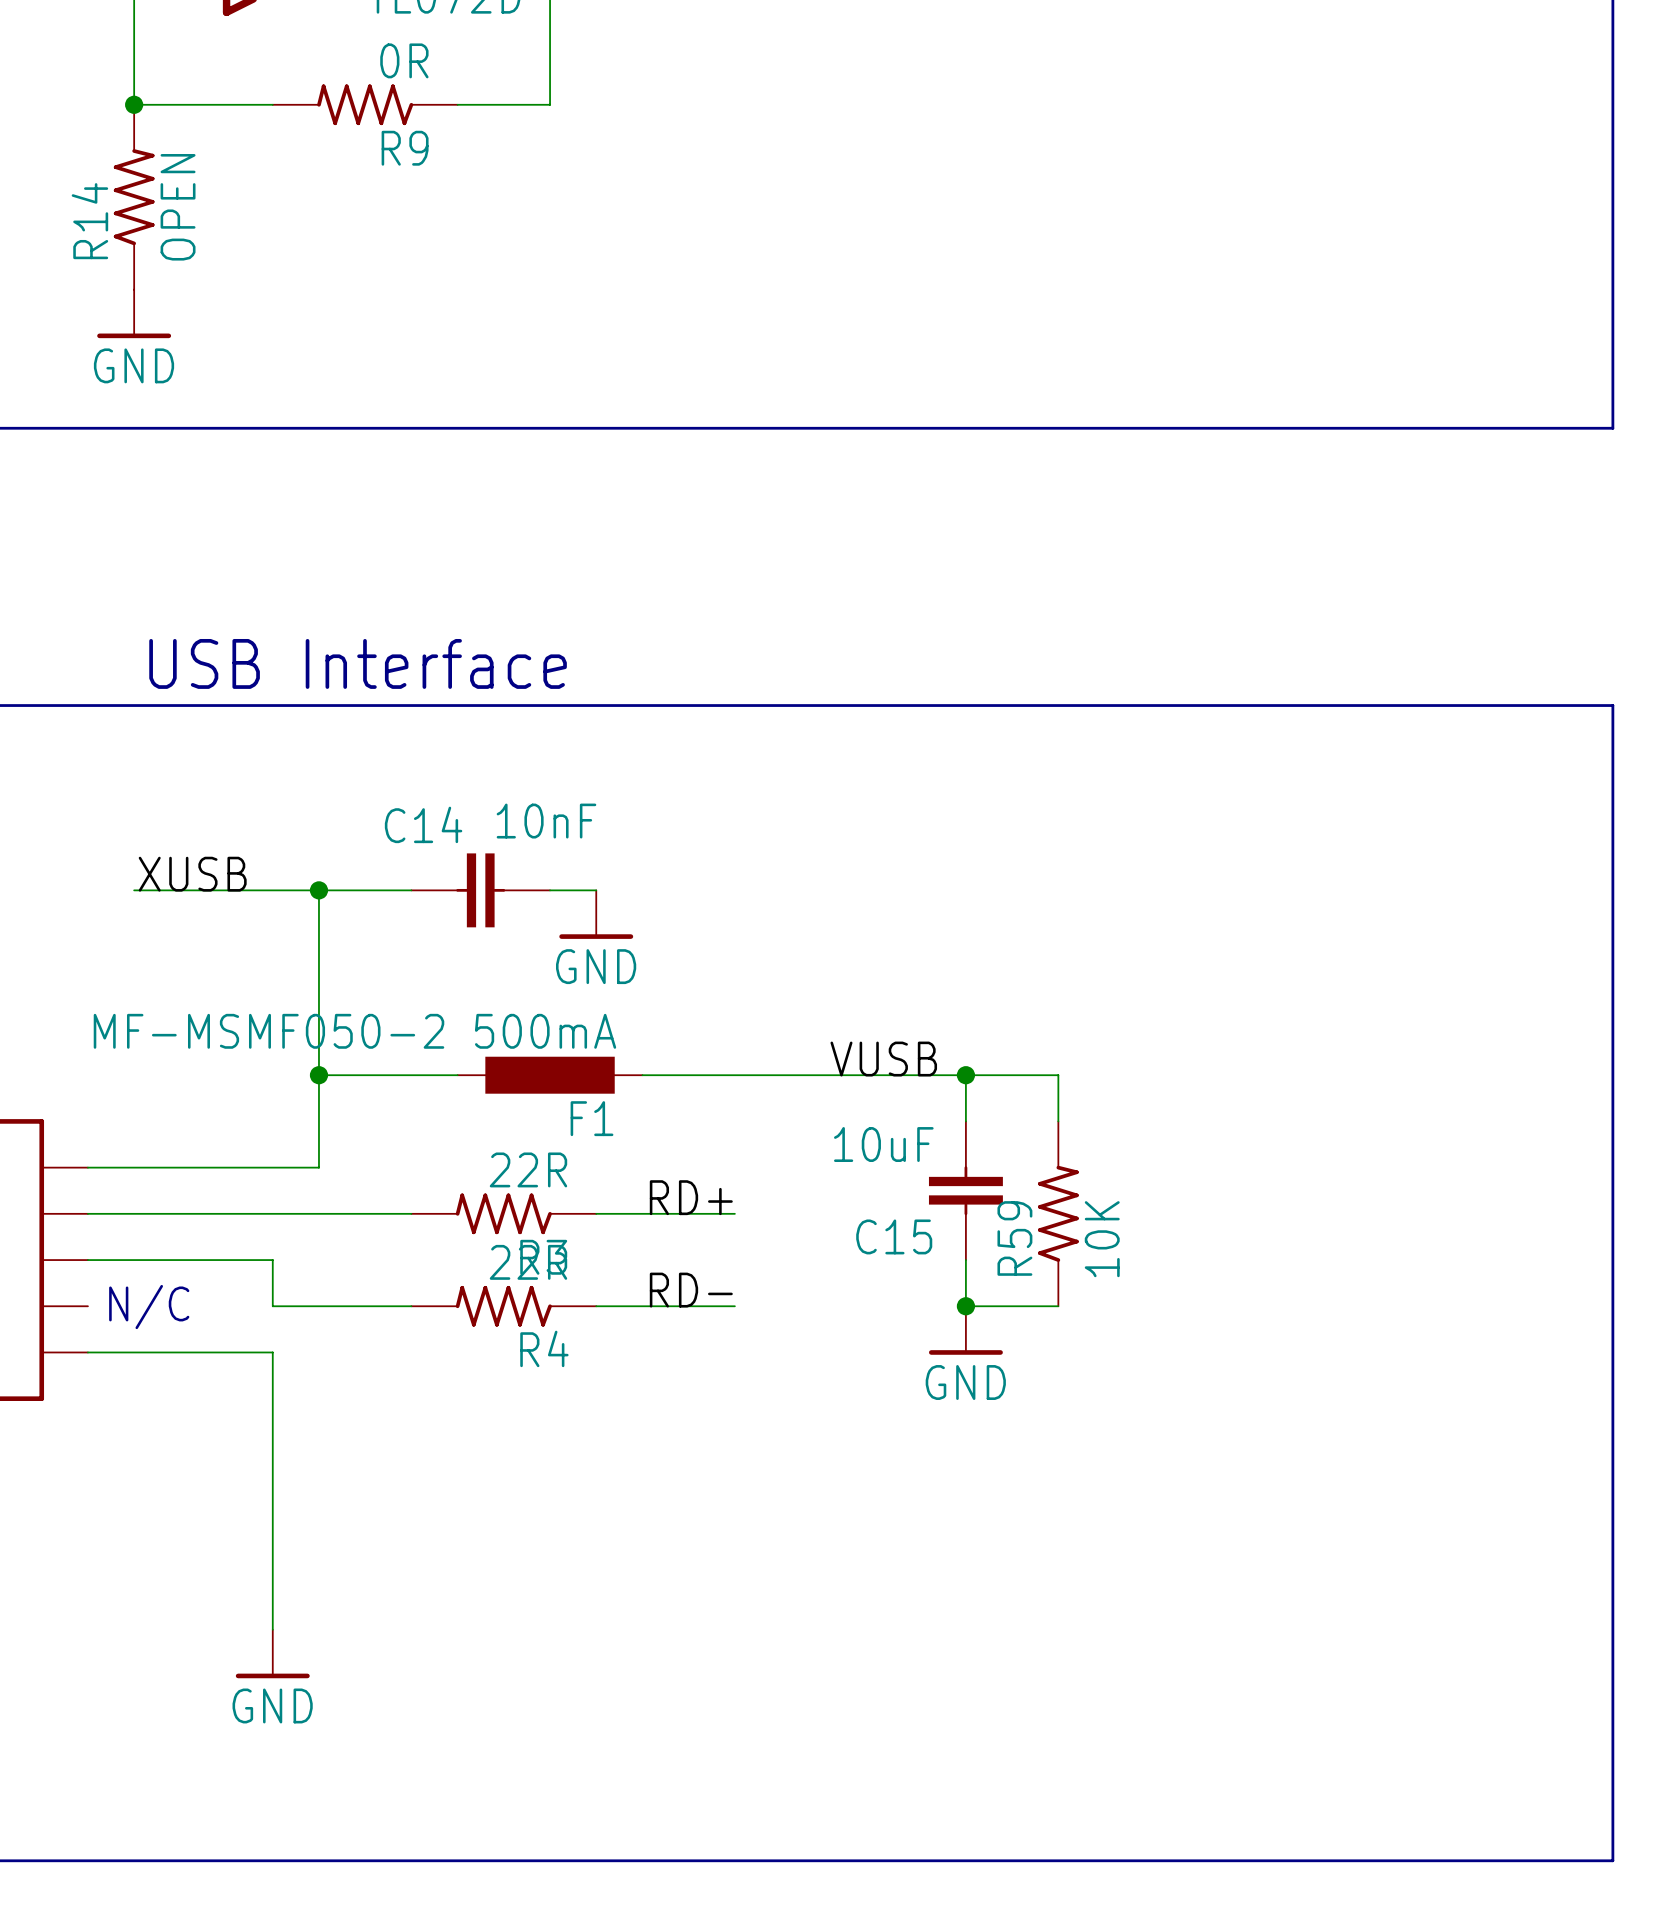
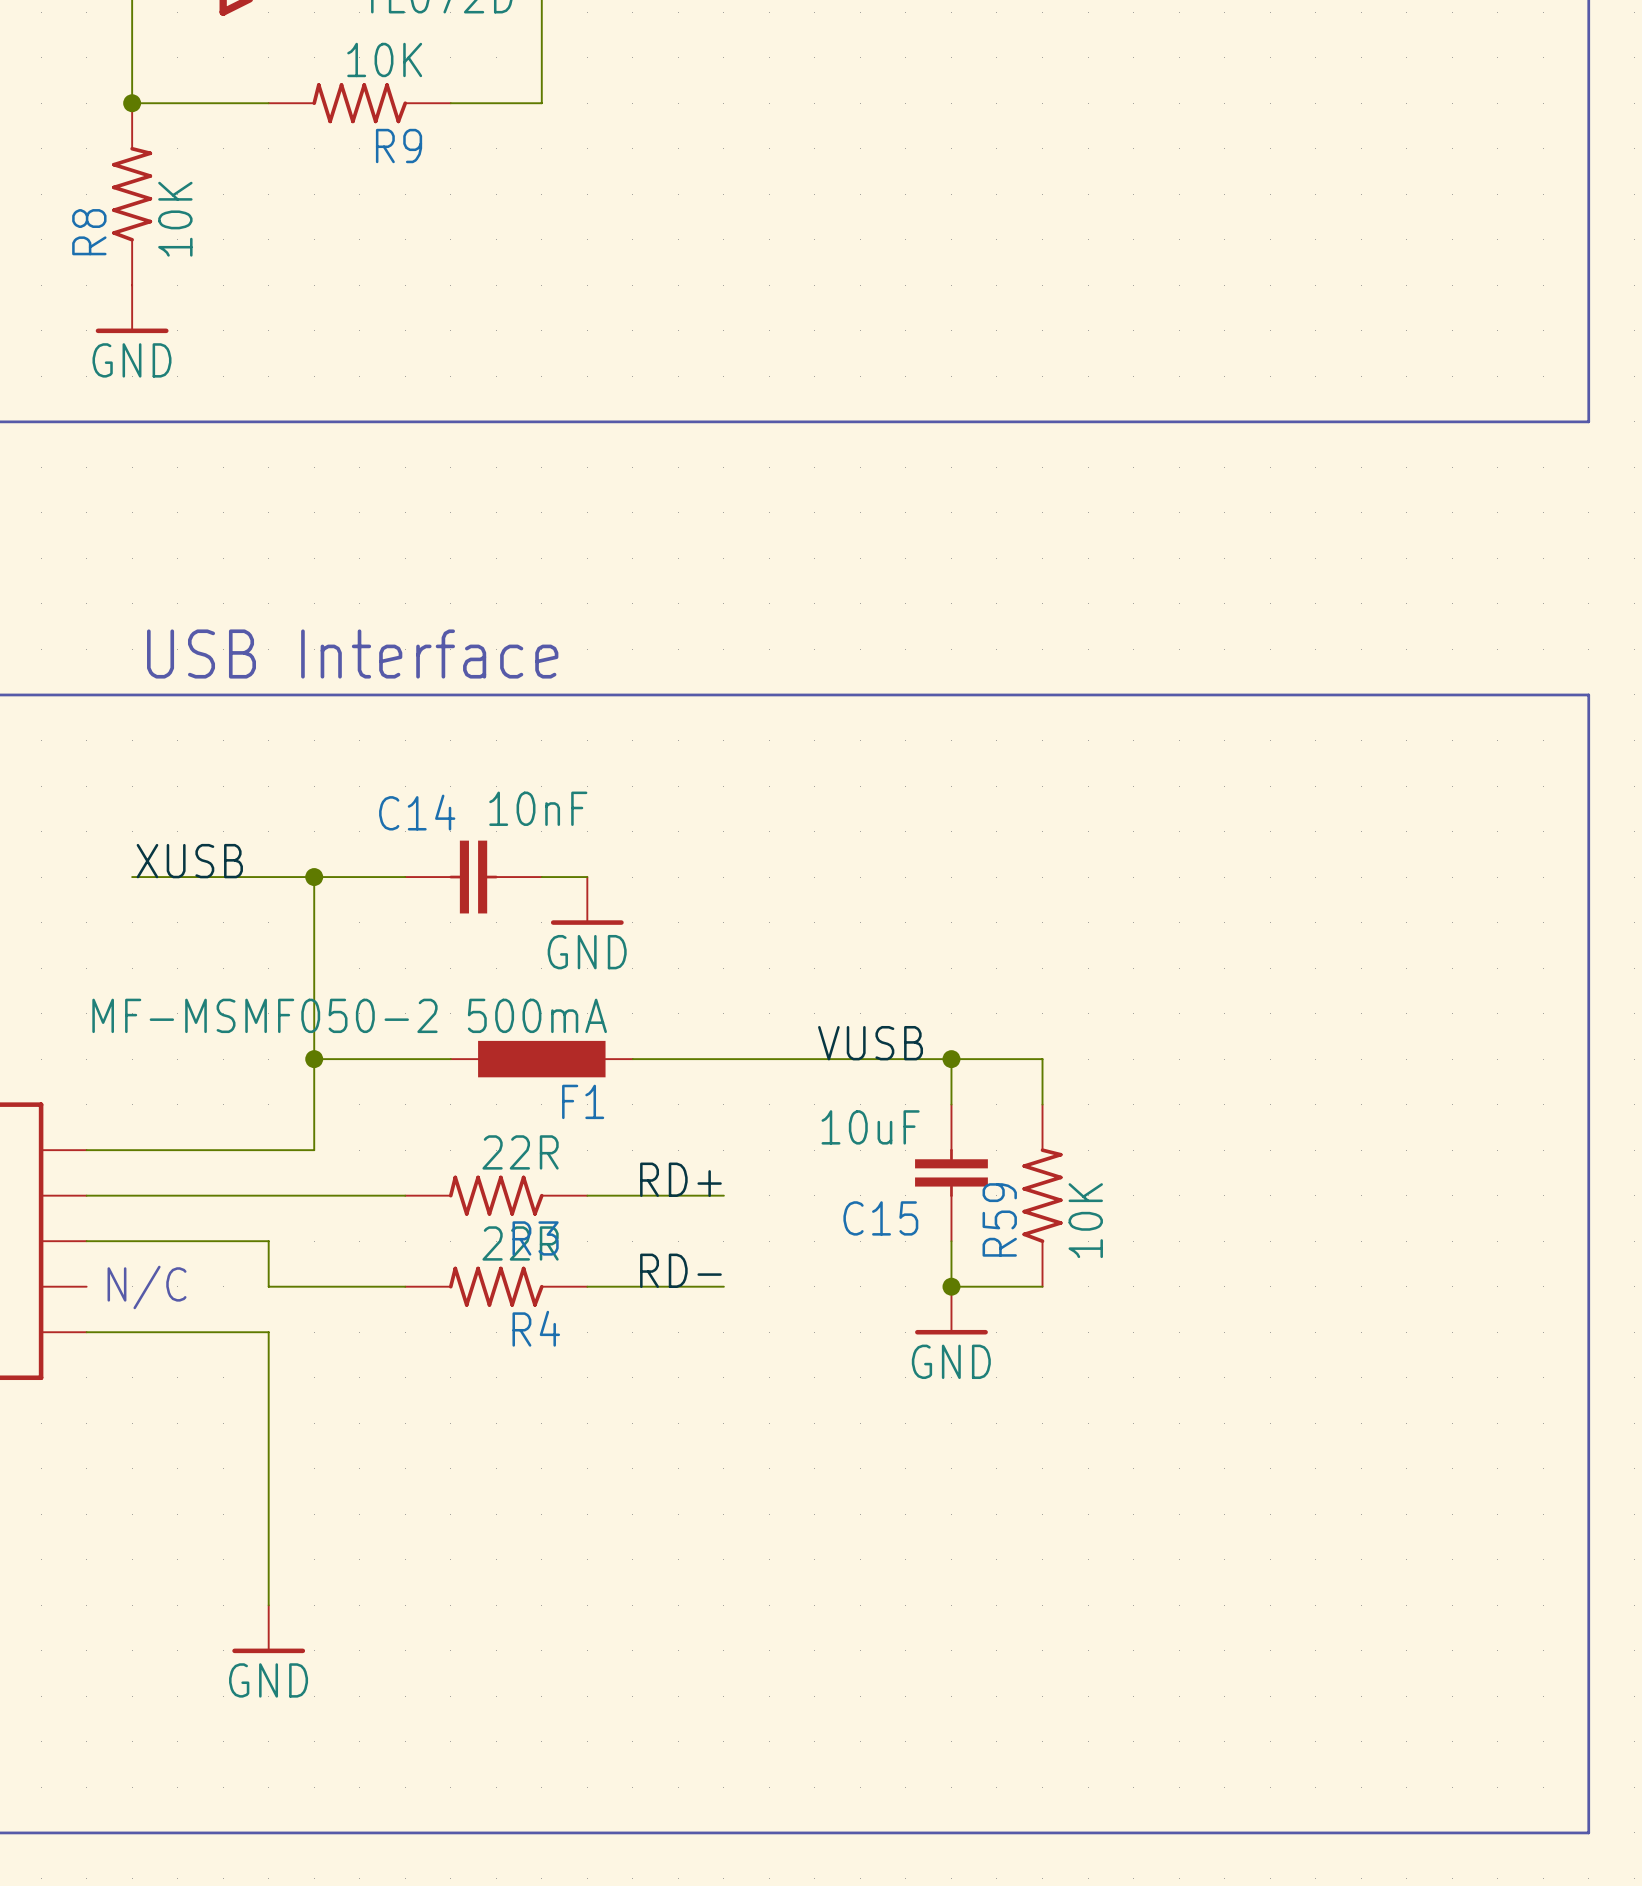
R9 value: 0R (404, 60) -> 10K (384, 59)
R14 value: OPEN (178, 207) -> 10K (175, 219)
R14 name: R14 (89, 221) -> R8 (89, 232)

